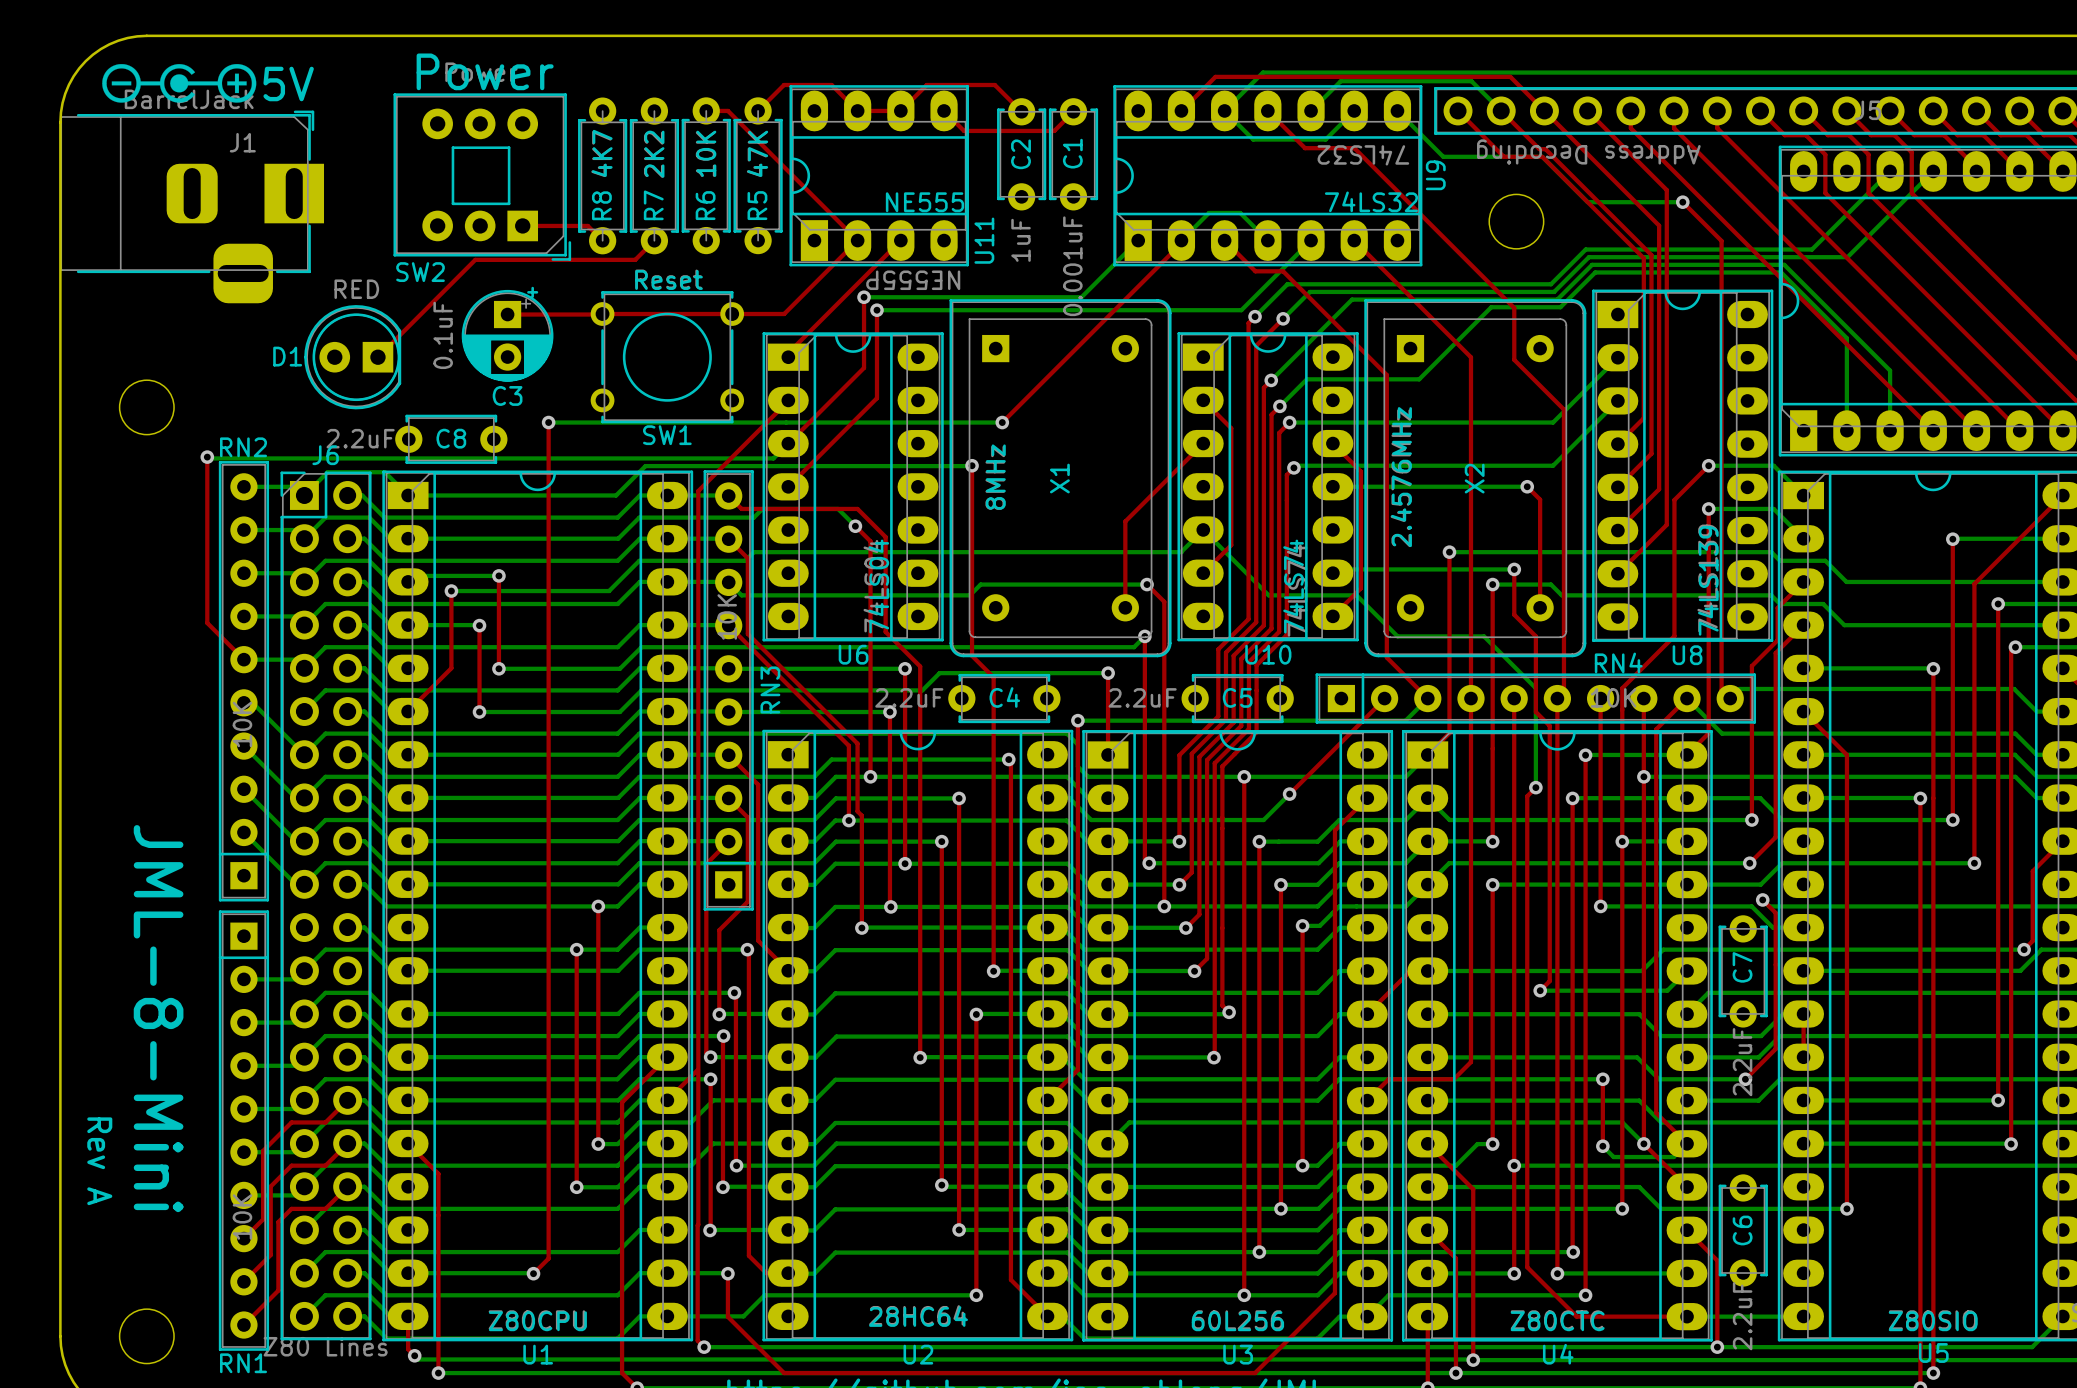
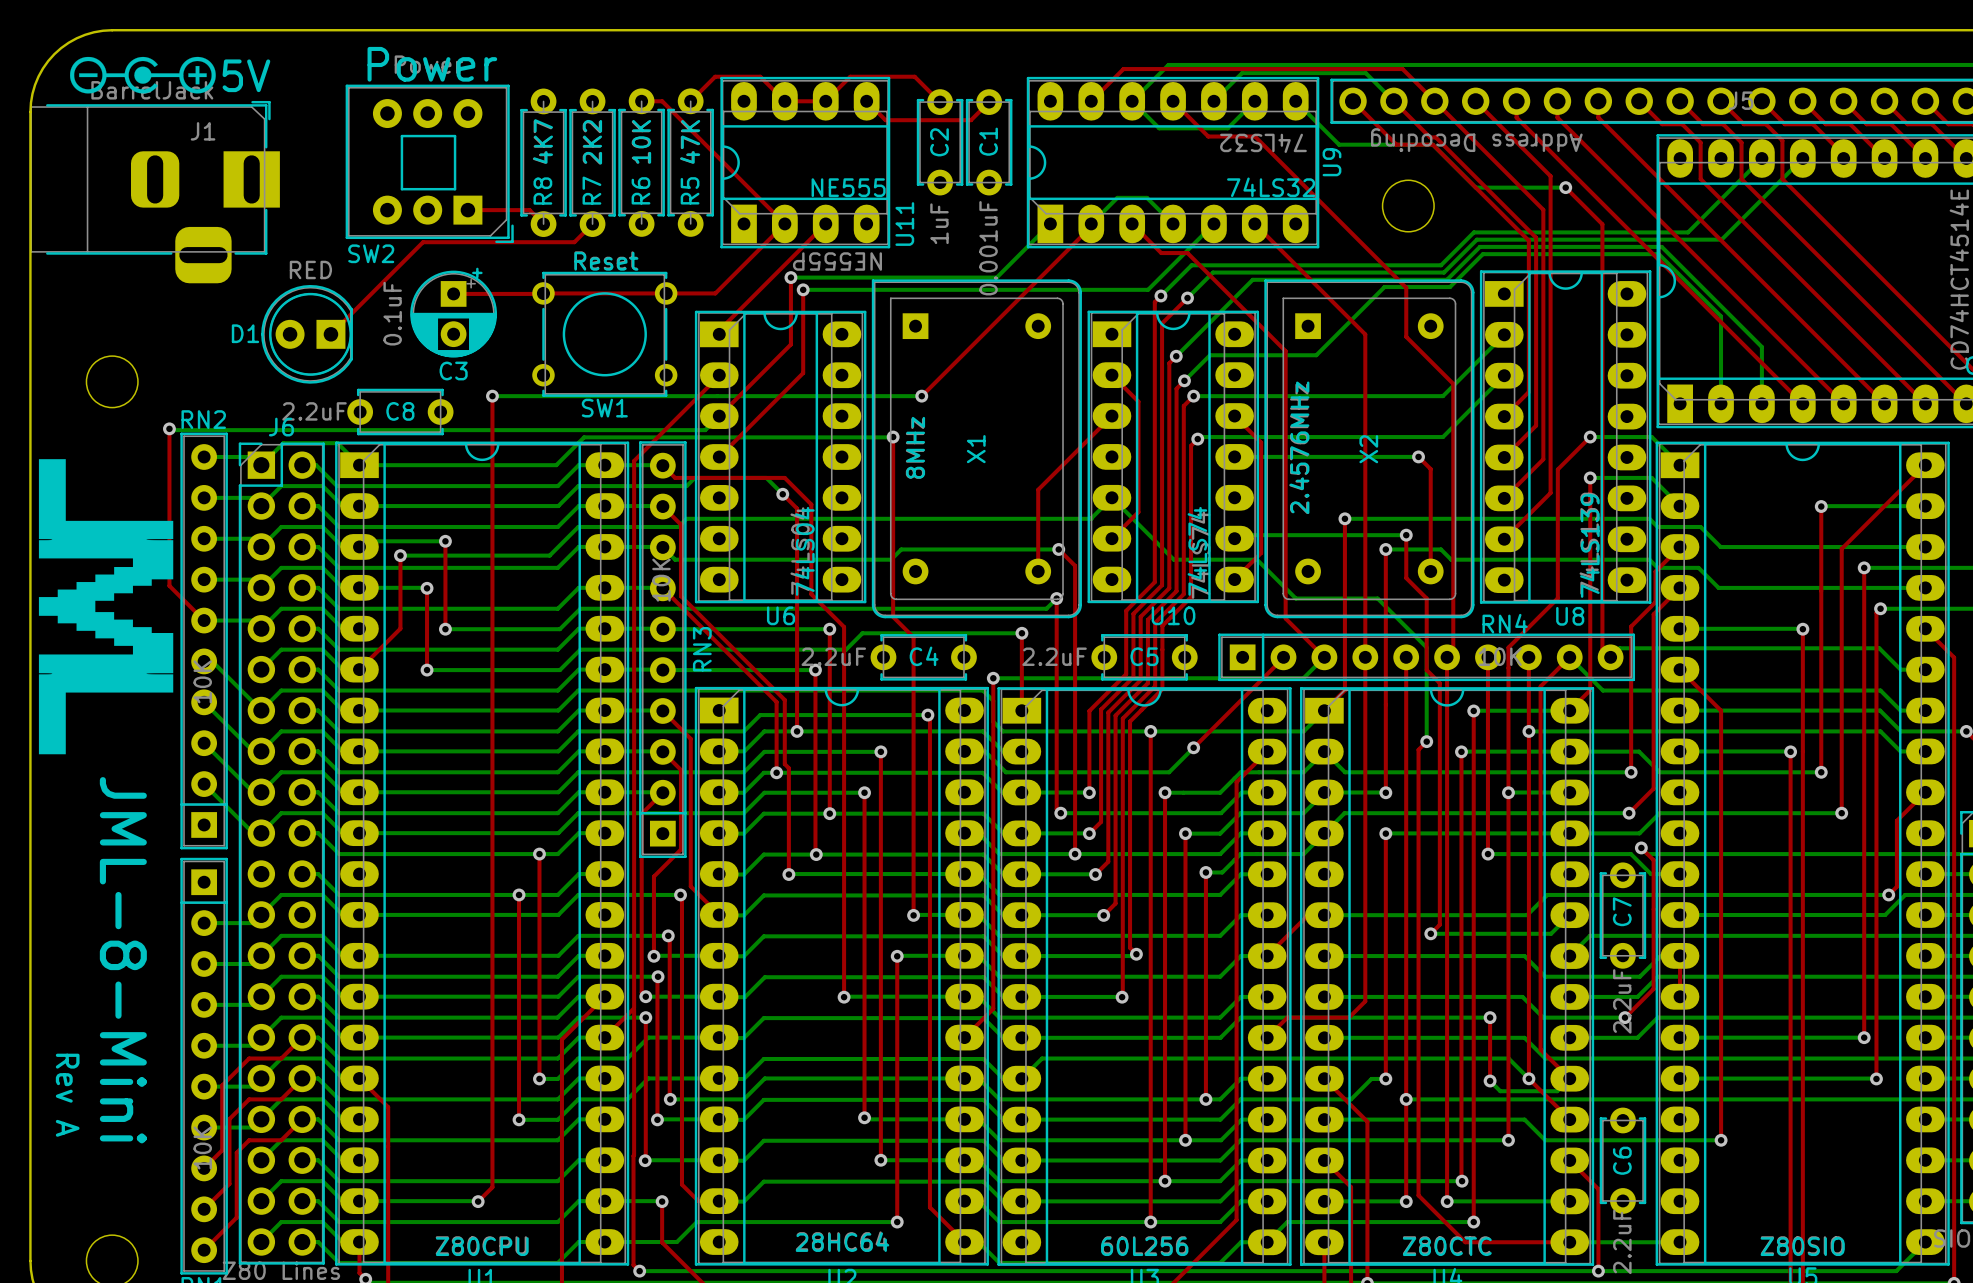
drawing: none -> [38, 459, 174, 755]

